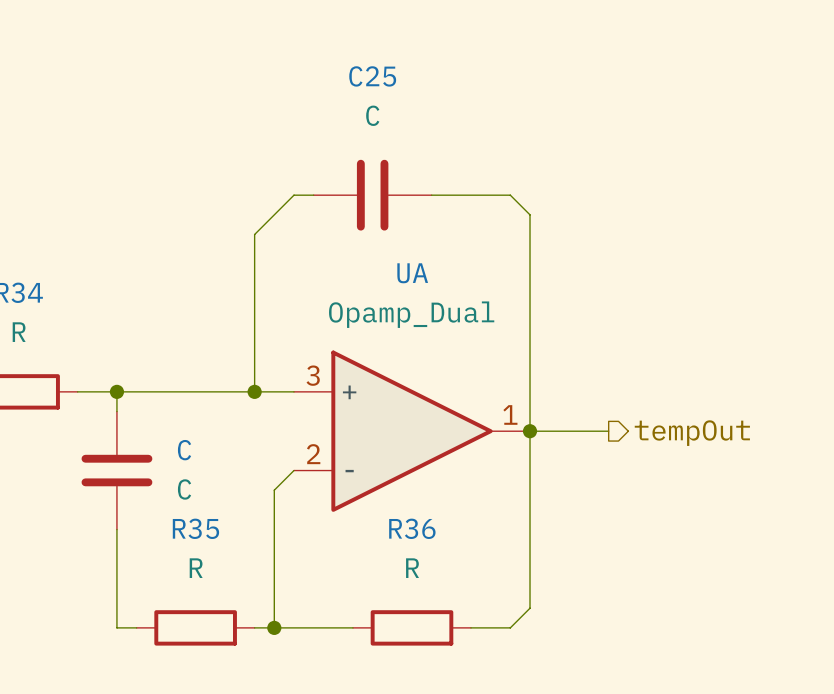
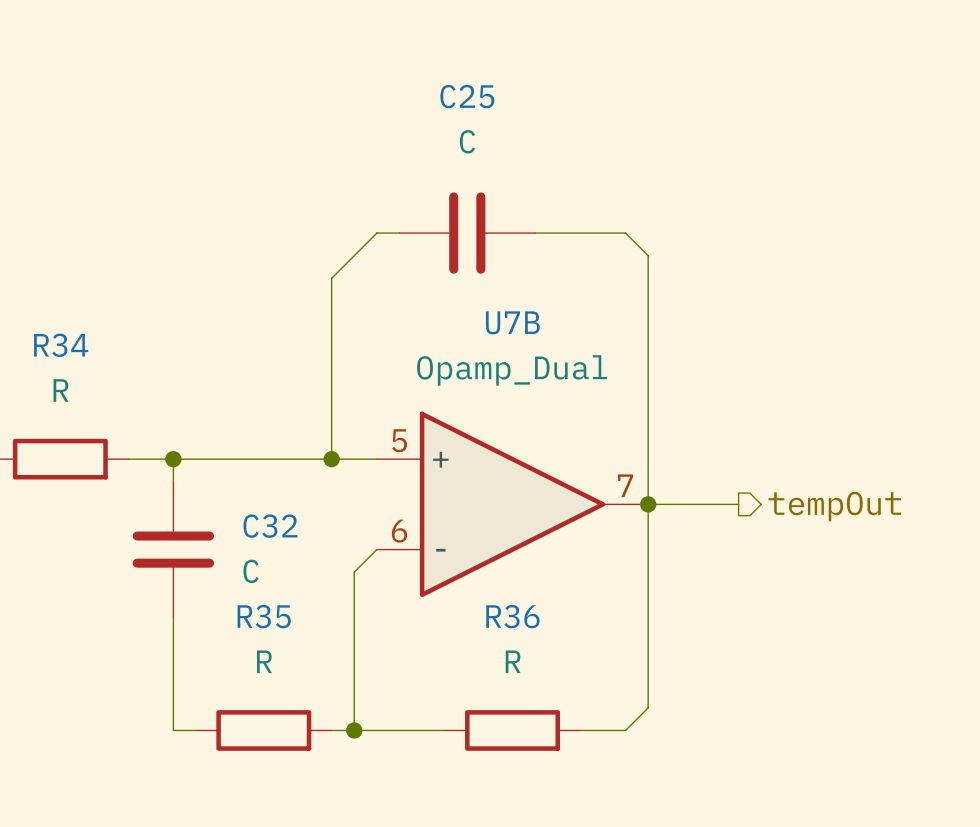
UA name: UA (412, 273) -> U7B (512, 322)
UA pin number: 3 (313, 375) -> 5 (399, 440)
UA pin number: 1 (510, 414) -> 7 (625, 485)
C name: C (184, 450) -> C32 (270, 526)
UA pin number: 2 (313, 454) -> 6 (399, 531)

